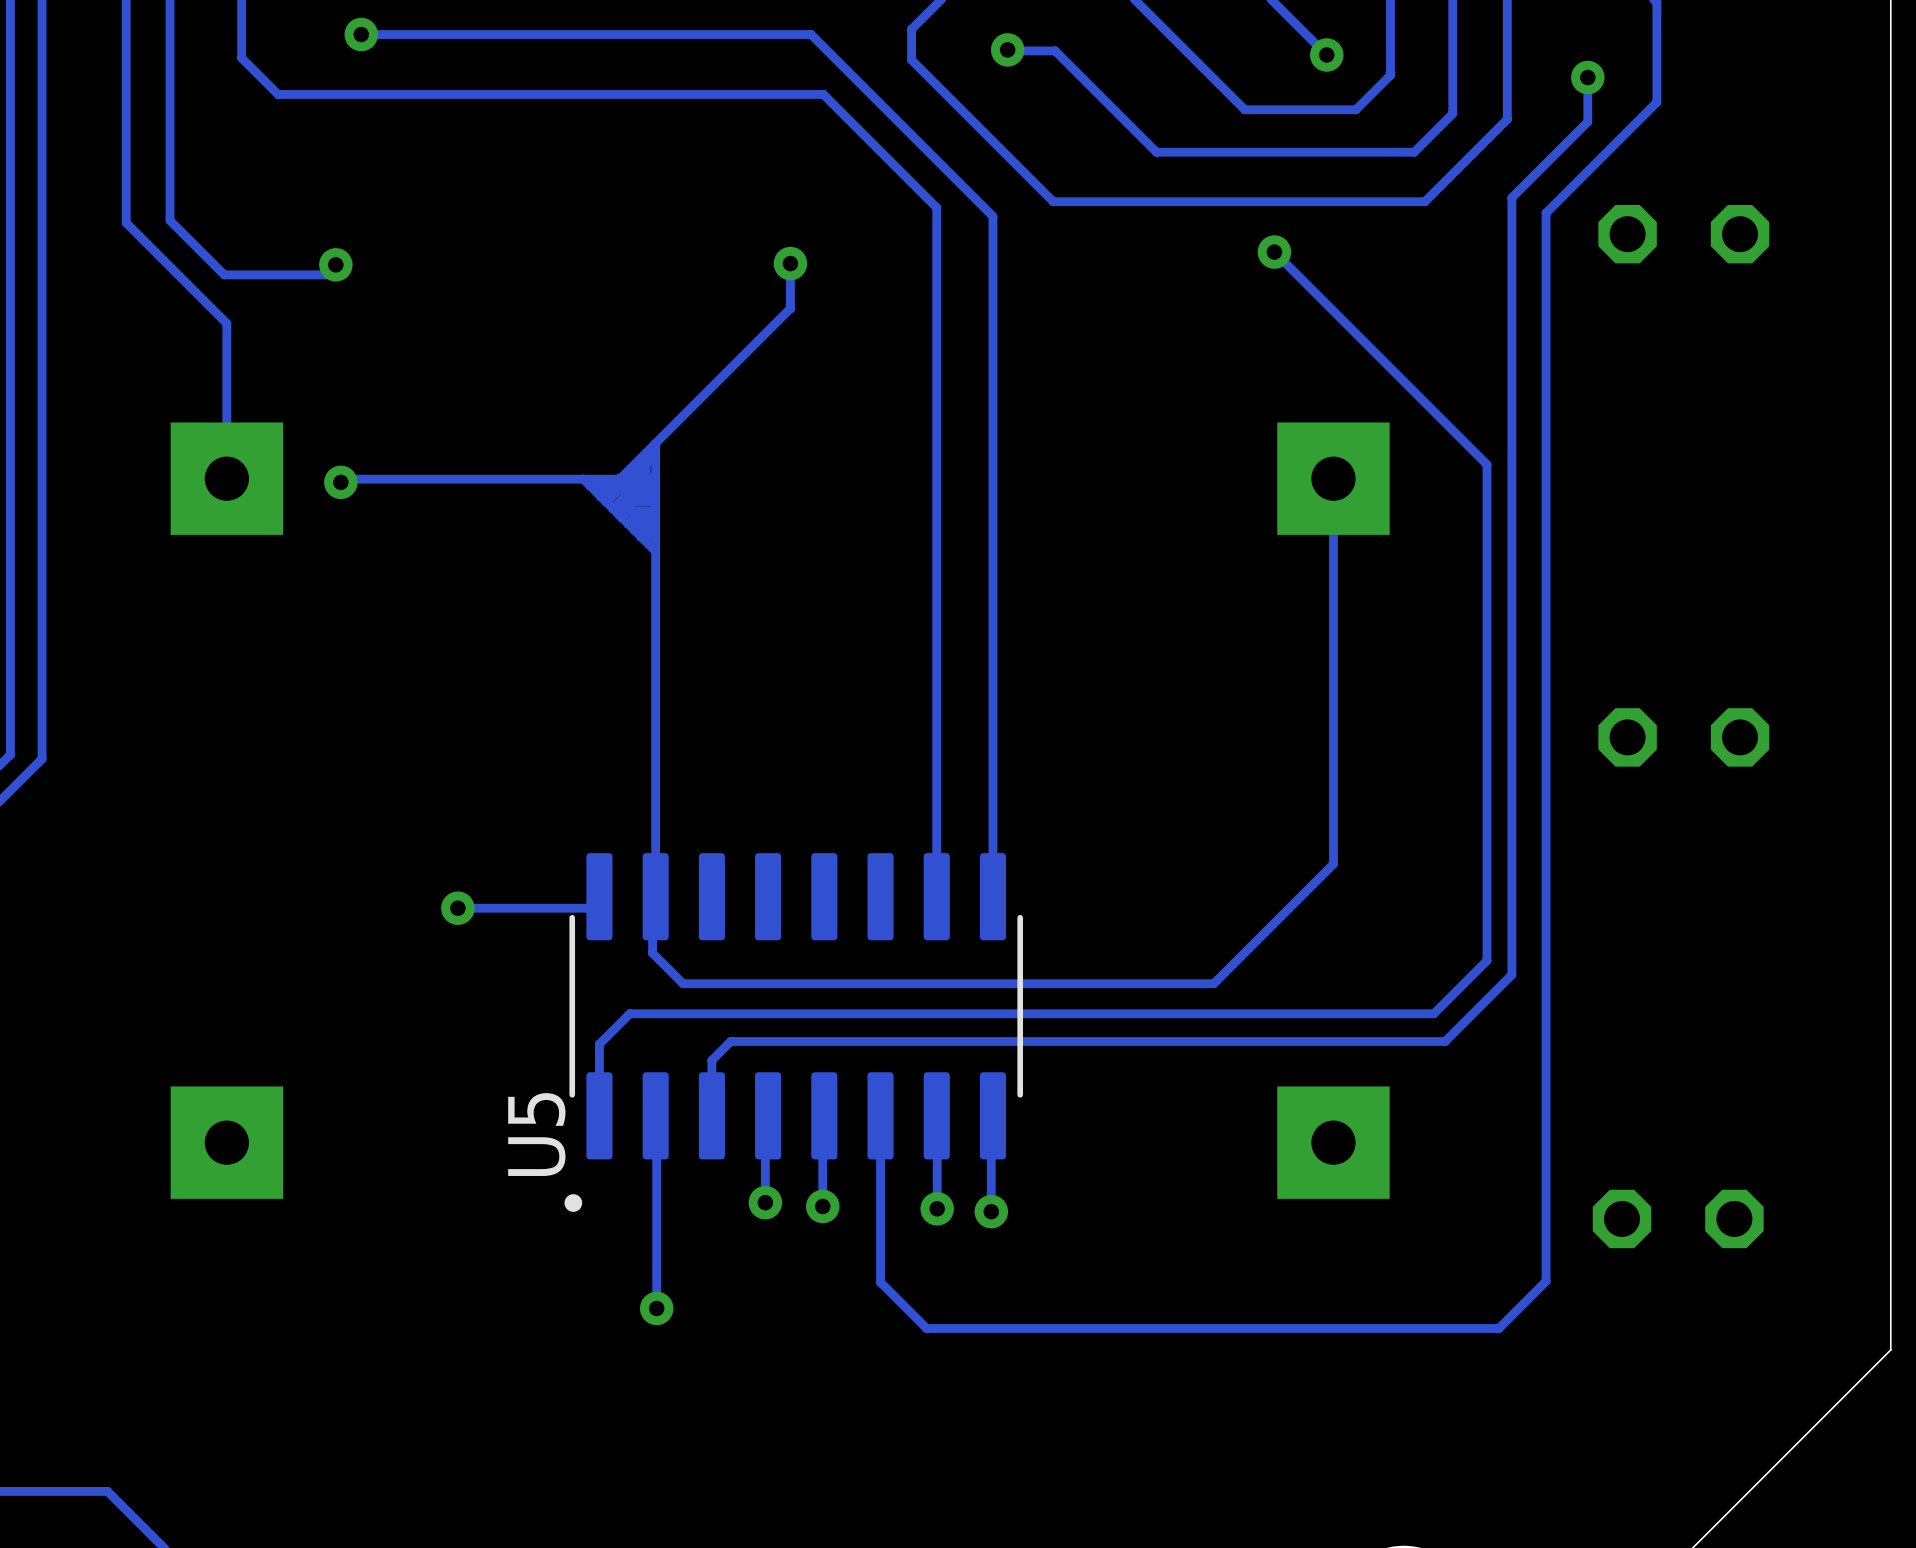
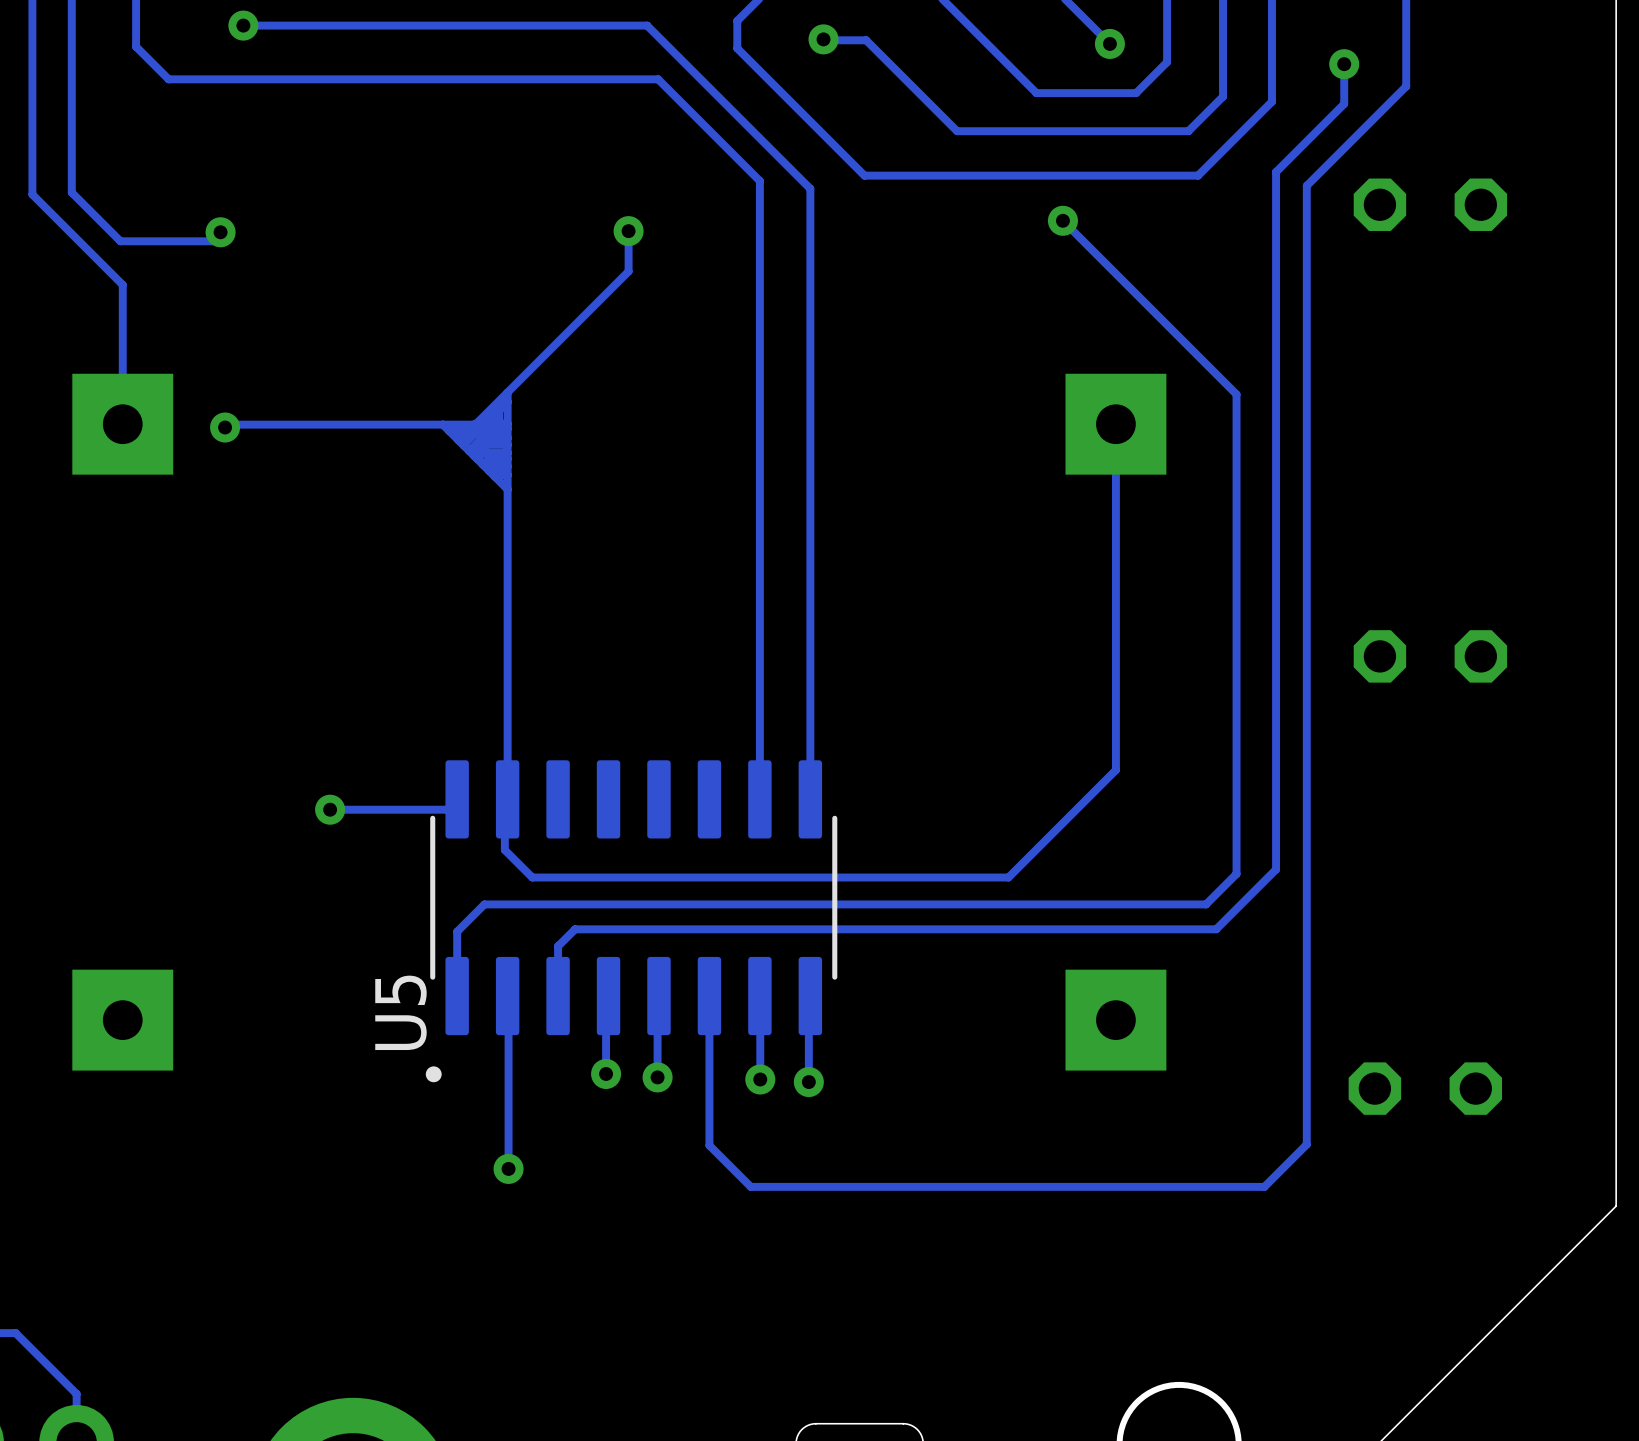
track: (1467, 445) (1486, 464) (1486, 960) (1467, 979) -> (1236, 394) (1236, 873)

